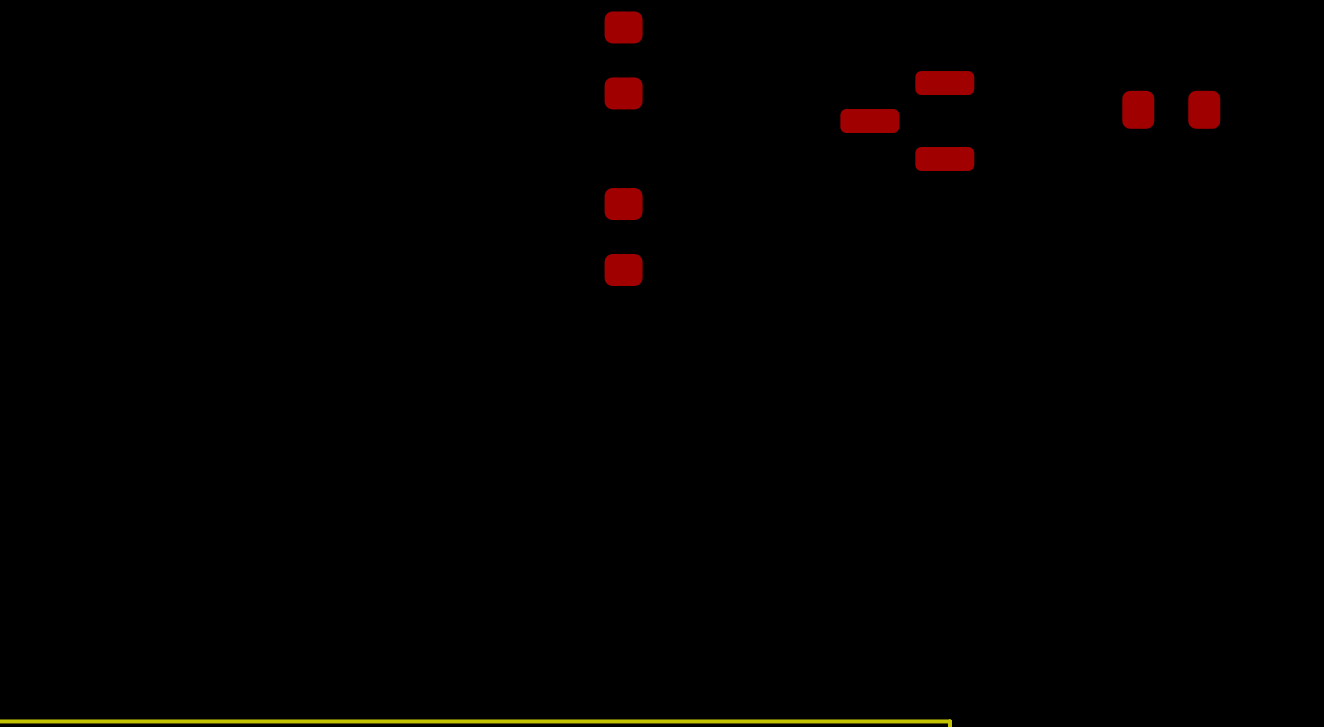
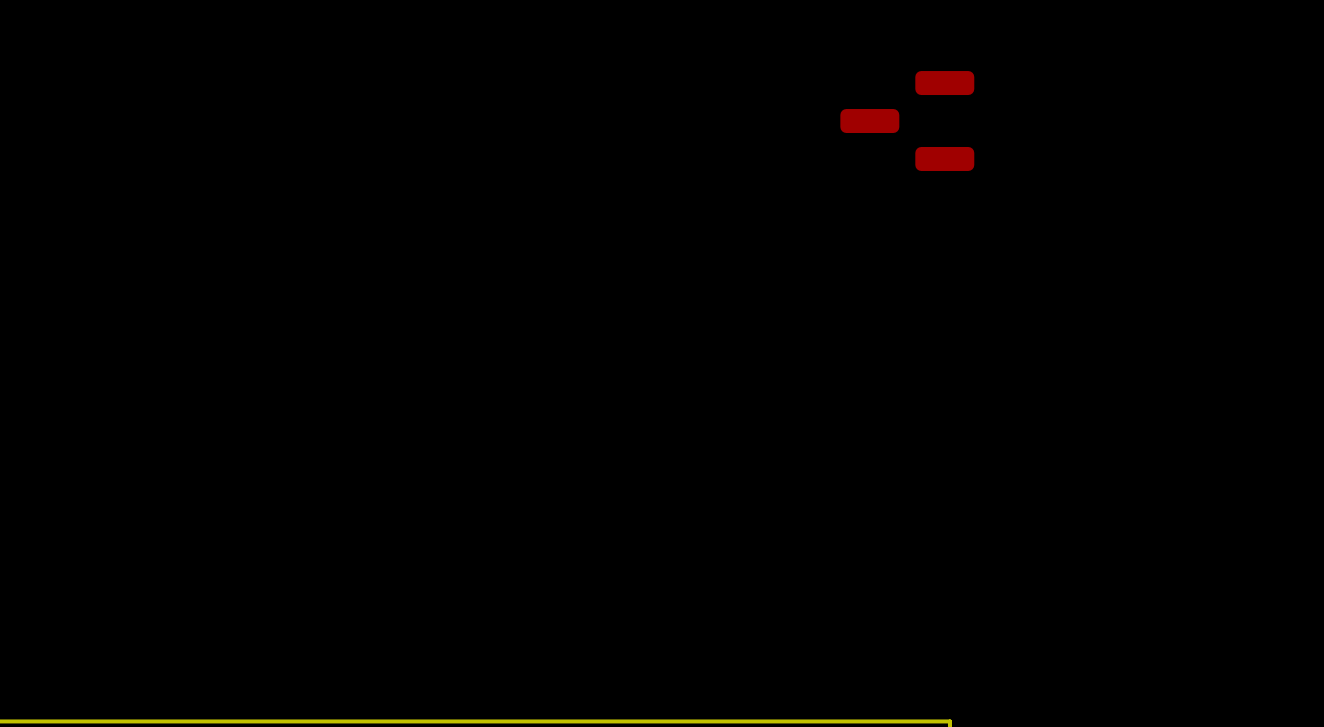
part: (623, 60) -> none
part: (1171, 109) -> none
part: (623, 237) -> none

